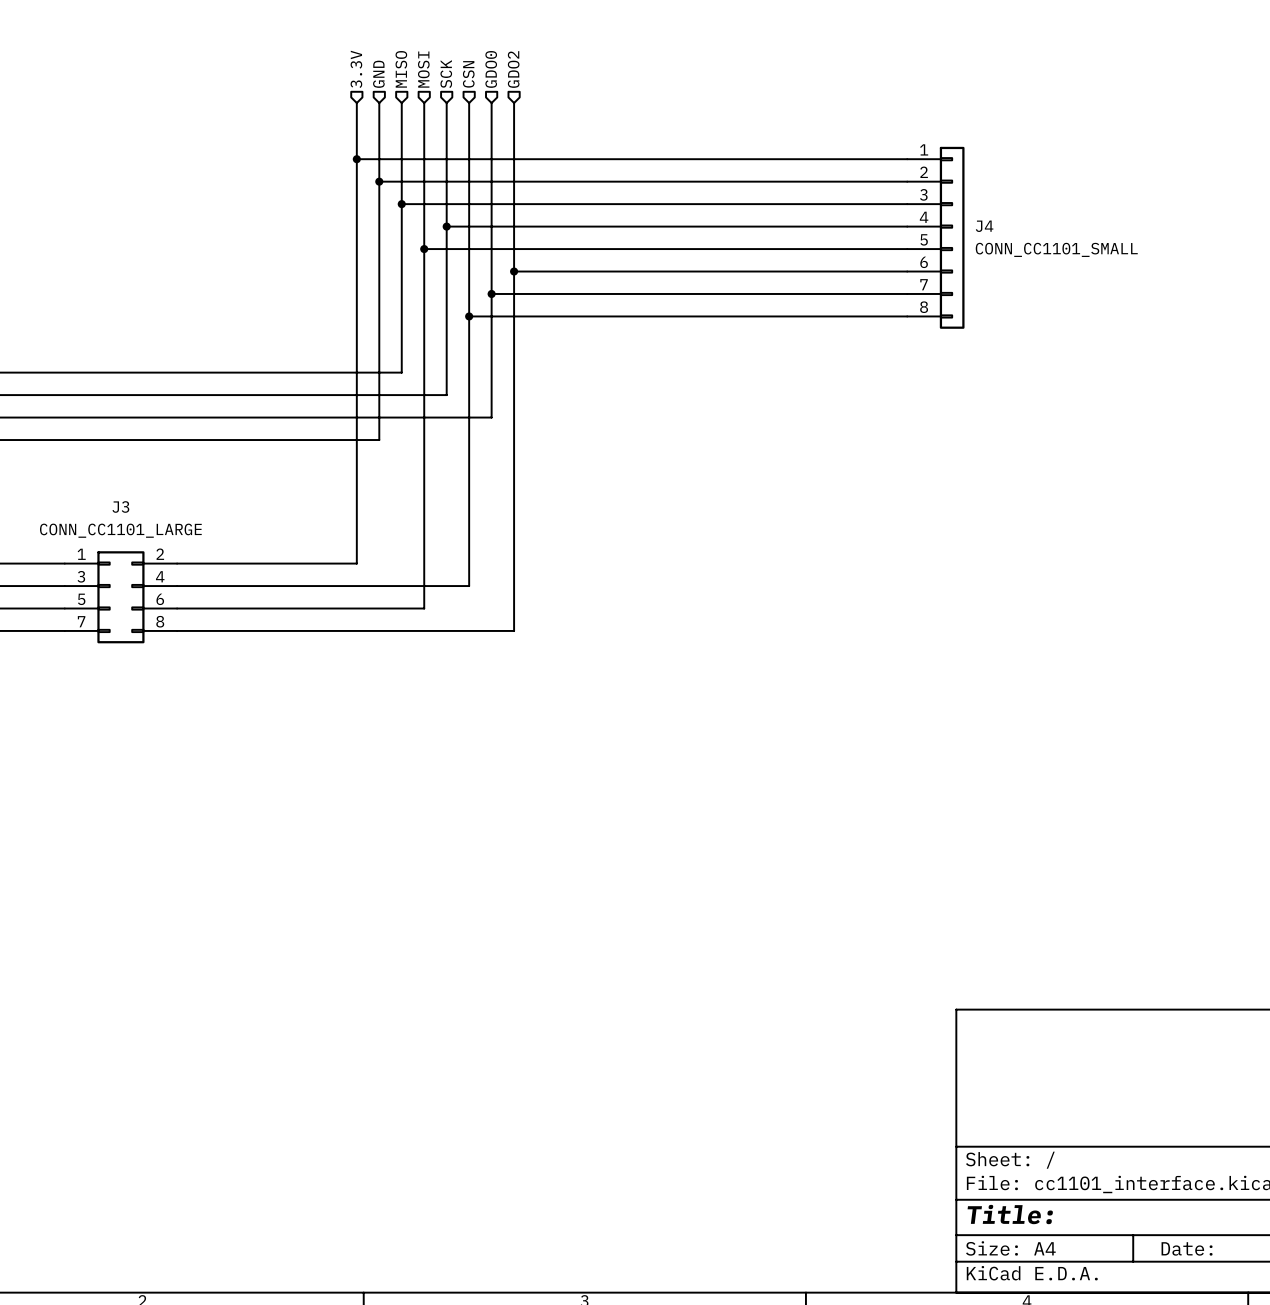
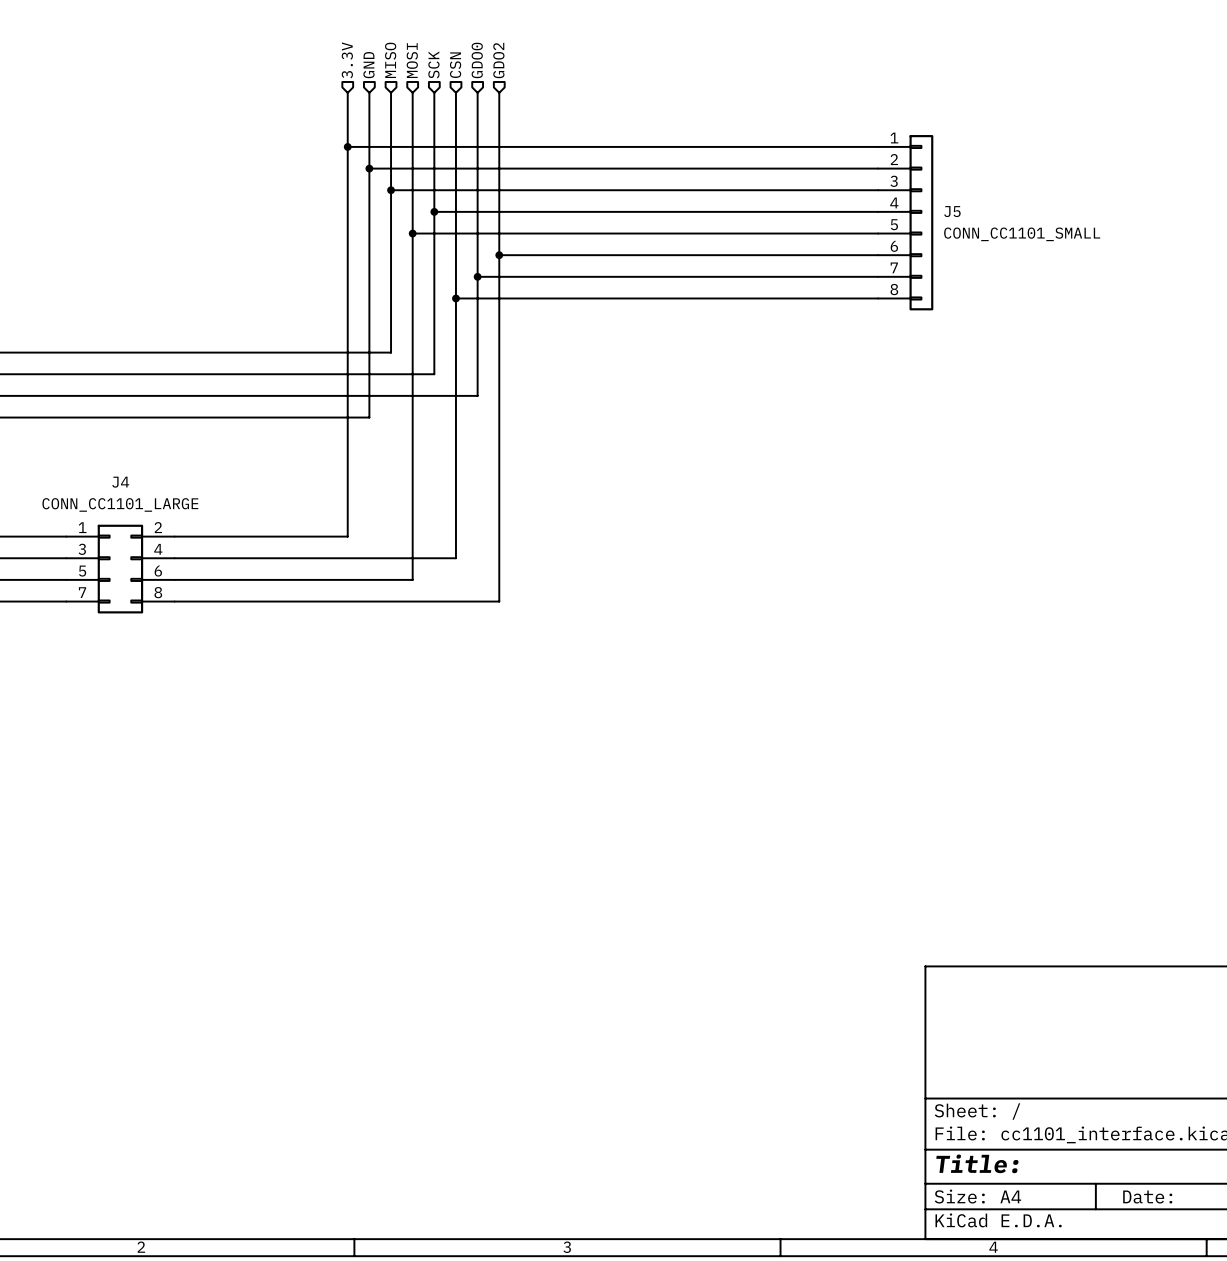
J4 name: J4 (984, 226) -> J5 (952, 211)
J3 name: J3 (120, 506) -> J4 (120, 482)

